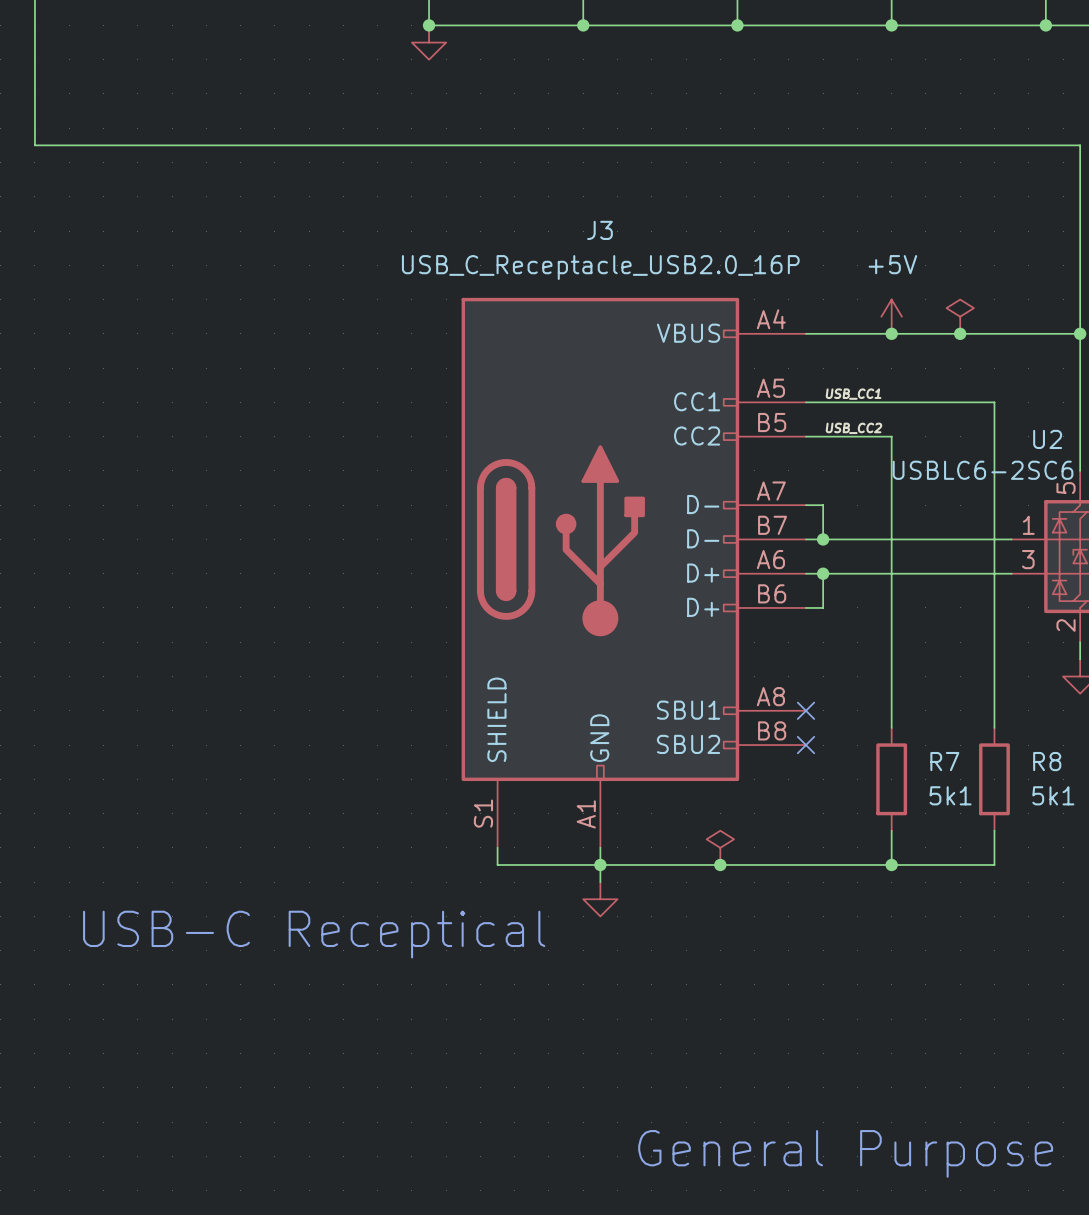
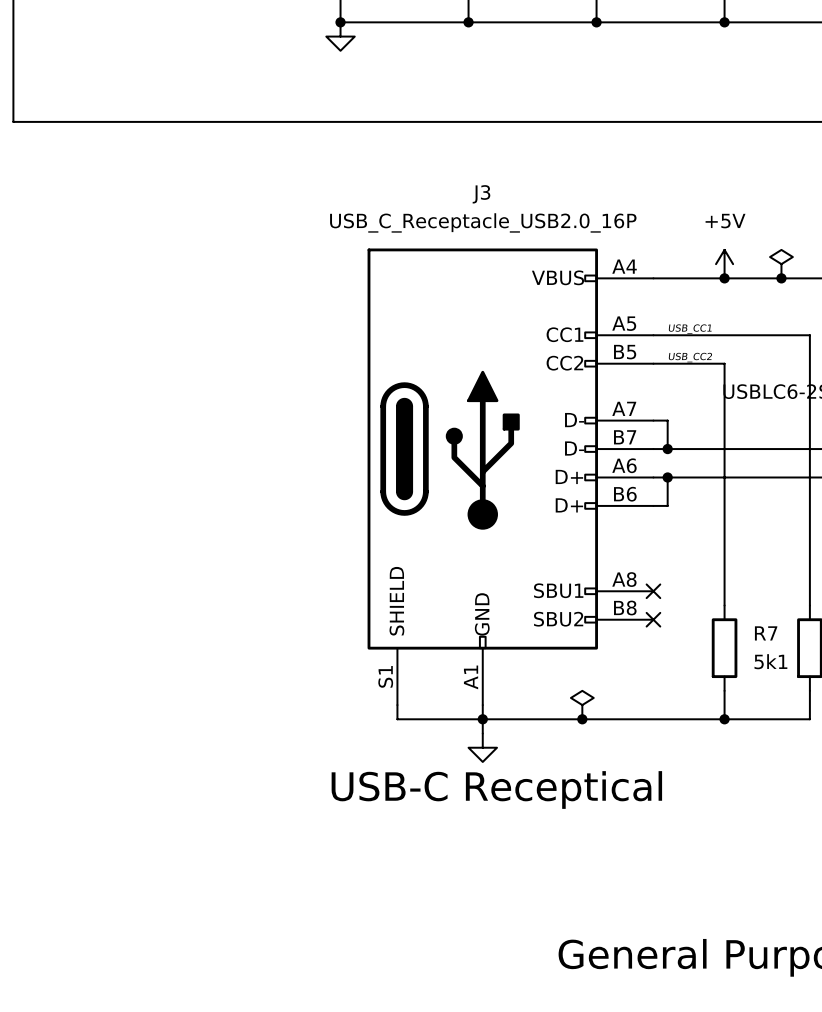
text position: USB-C Receptical (314, 934) -> USB-C Receptical (496, 789)

